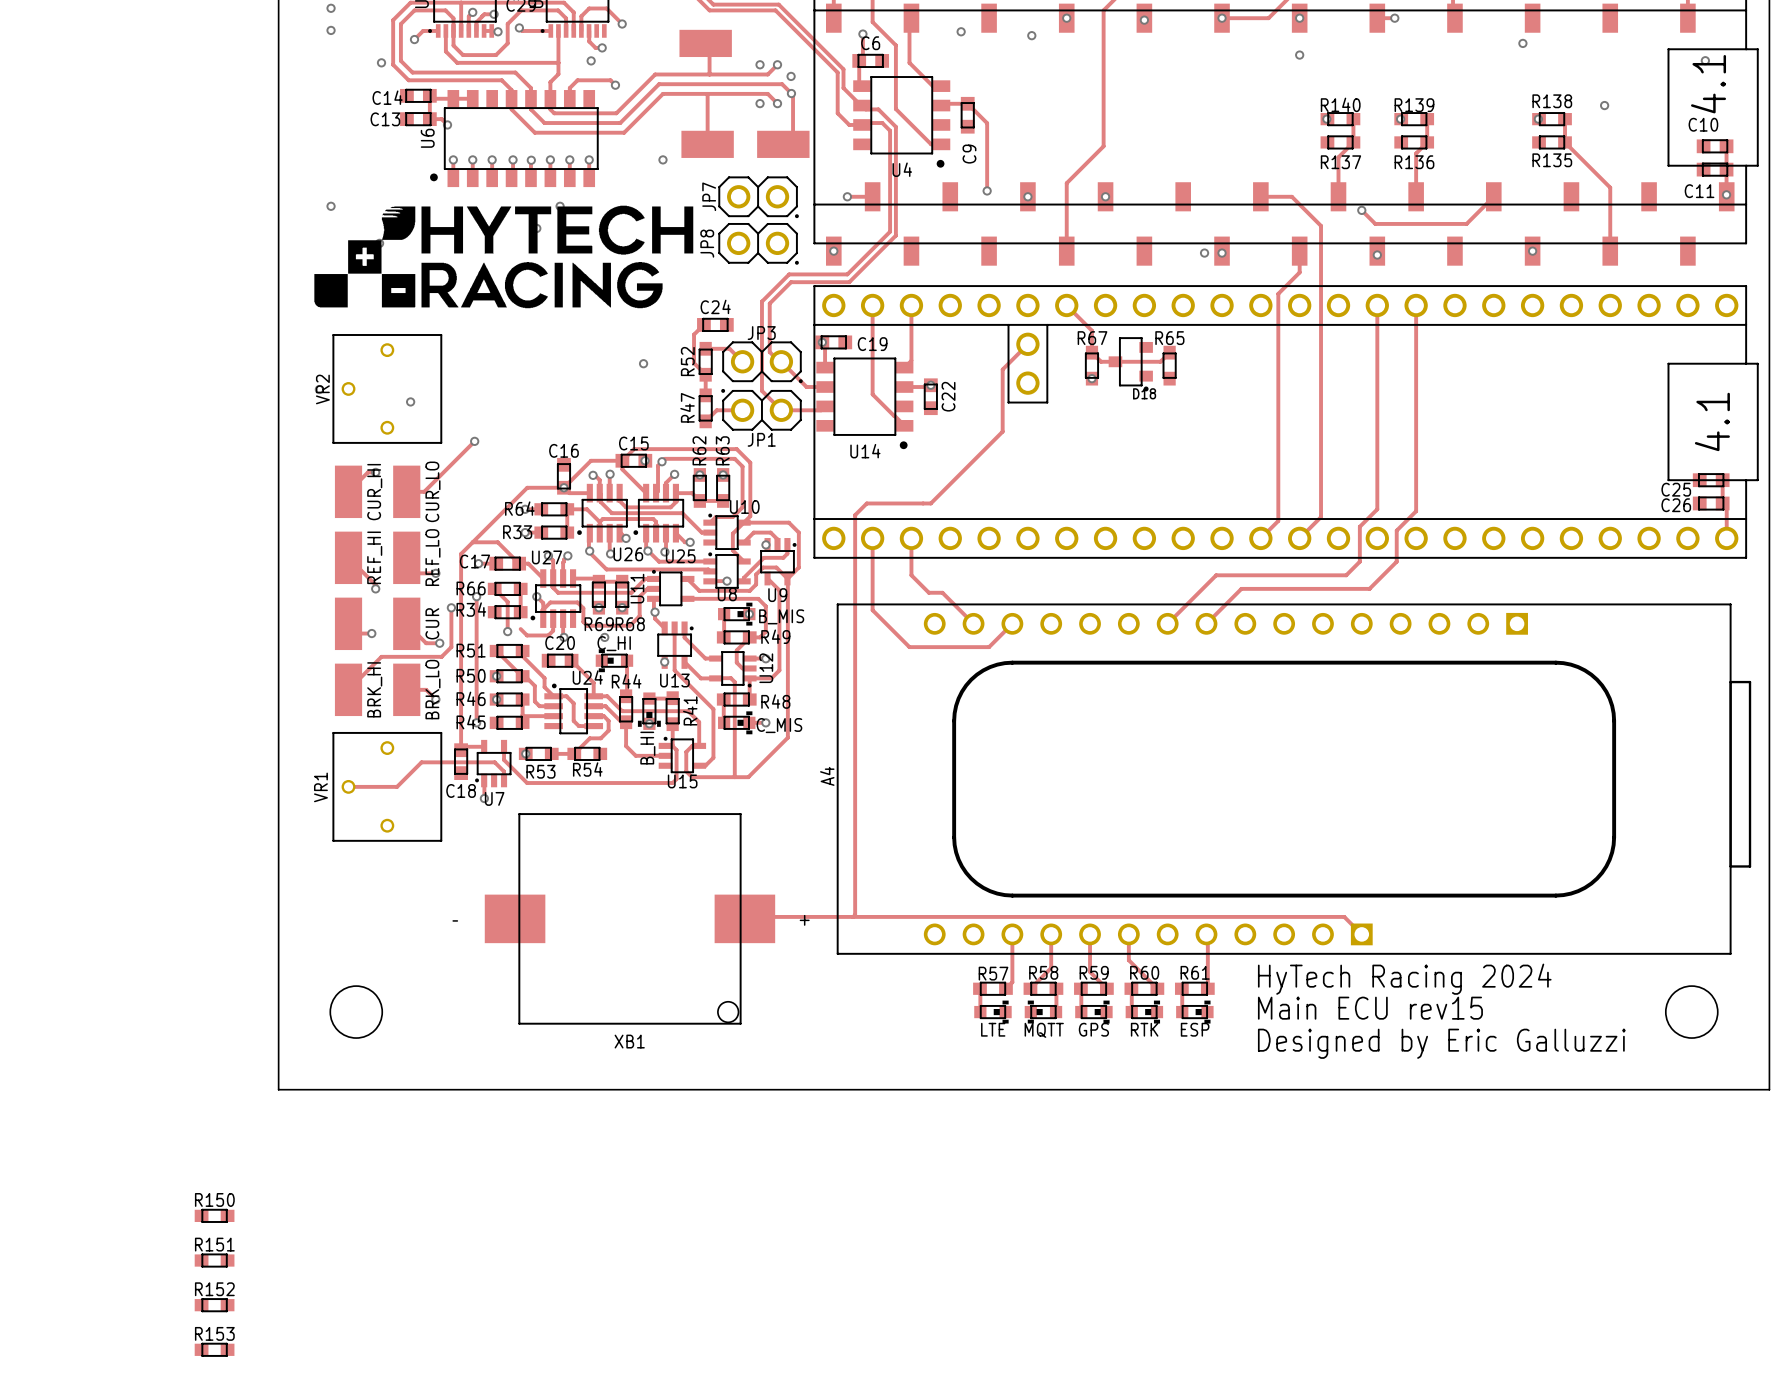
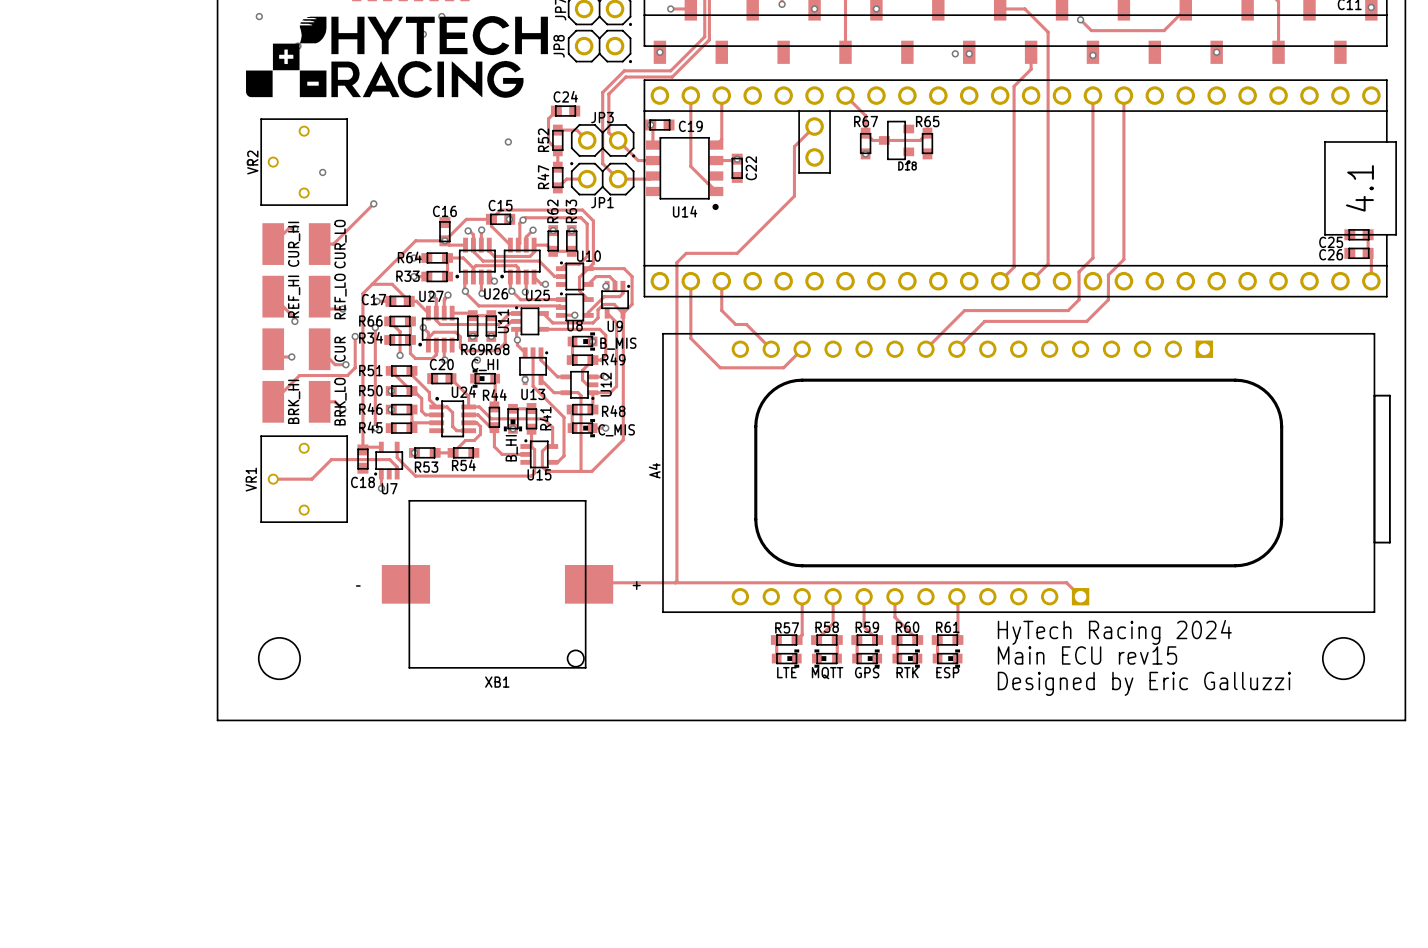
track: none -> (410, 339) (410, 353)
R150: (214, 1215) -> none
R151: (214, 1260) -> none
R152: (214, 1305) -> none
R153: (214, 1349) -> none

